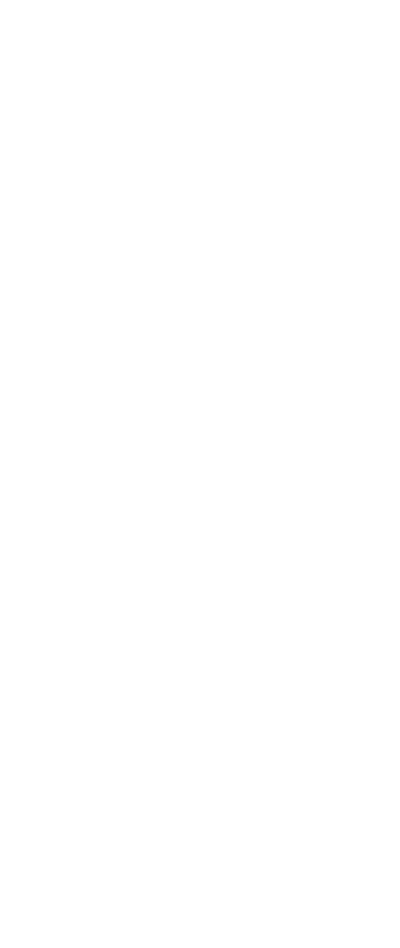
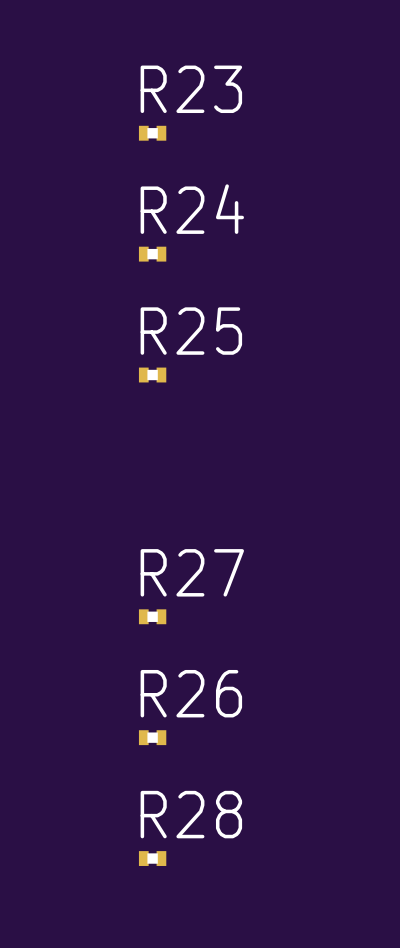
R23: none -> (152, 133)
R24: none -> (152, 254)
R25: none -> (152, 375)
R27: none -> (152, 616)
R26: none -> (152, 737)
R28: none -> (152, 858)

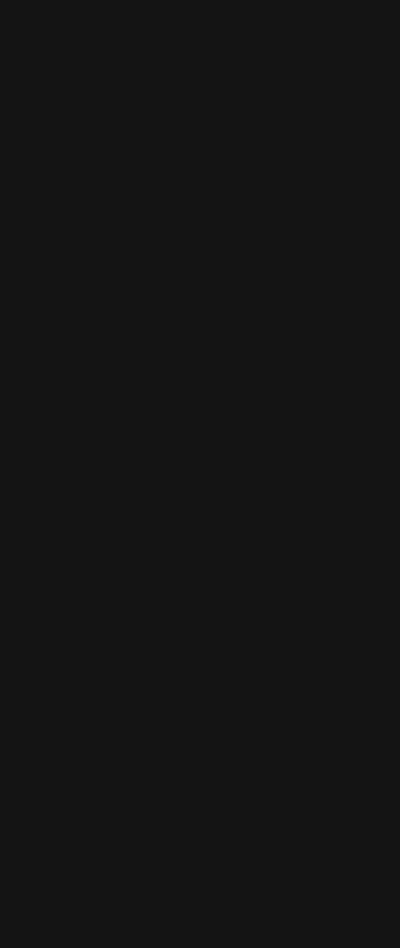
R23: (152, 133) -> none
R24: (152, 254) -> none
R25: (152, 375) -> none
R27: (152, 616) -> none
R26: (152, 737) -> none
R28: (152, 858) -> none

